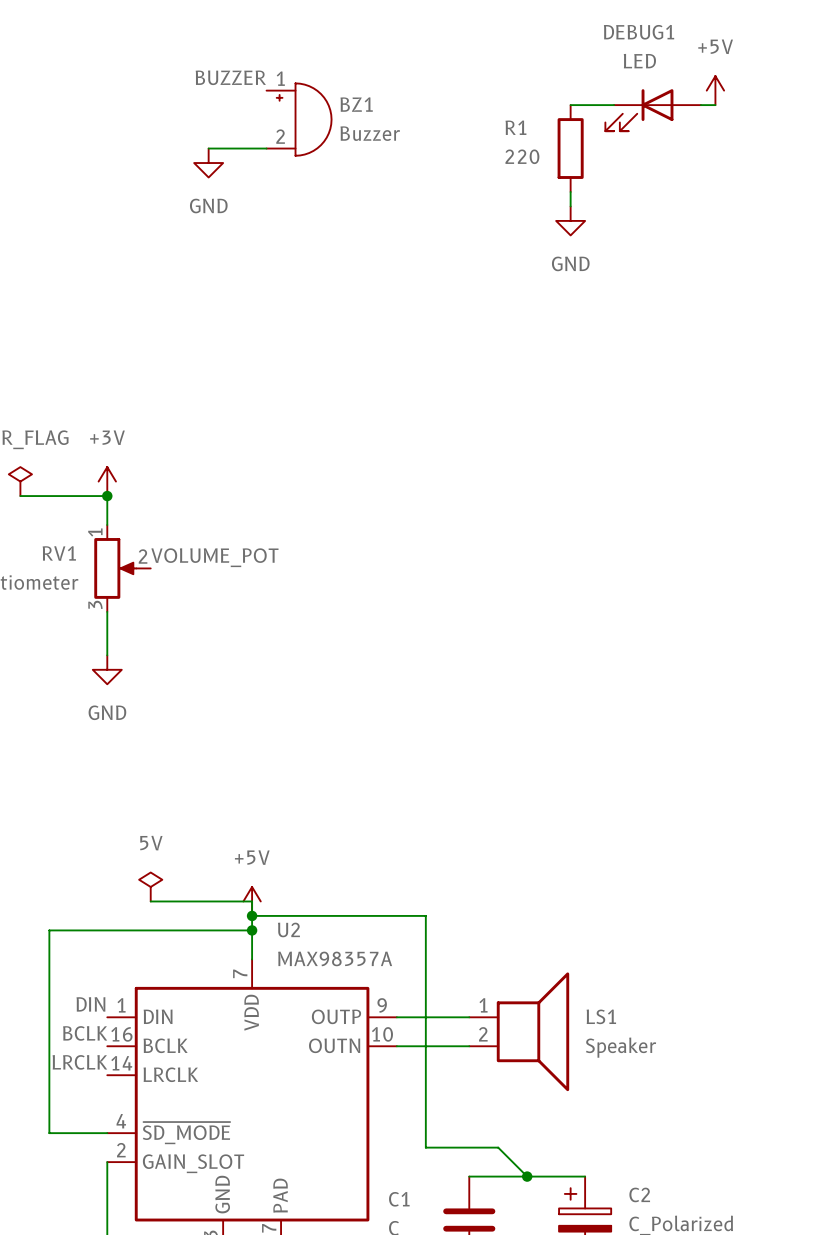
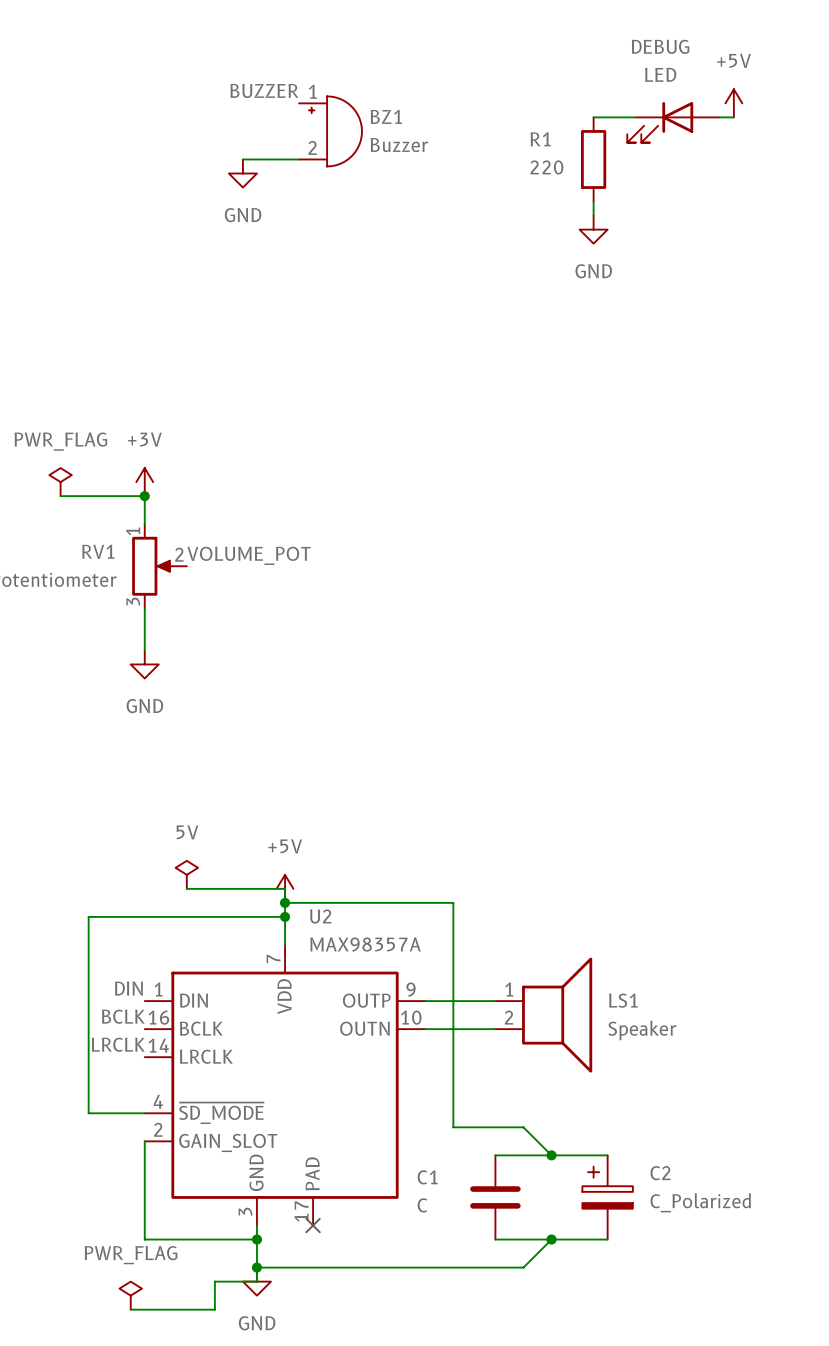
DEBUG1 name: DEBUG1 (639, 32) -> DEBUG (660, 46)

